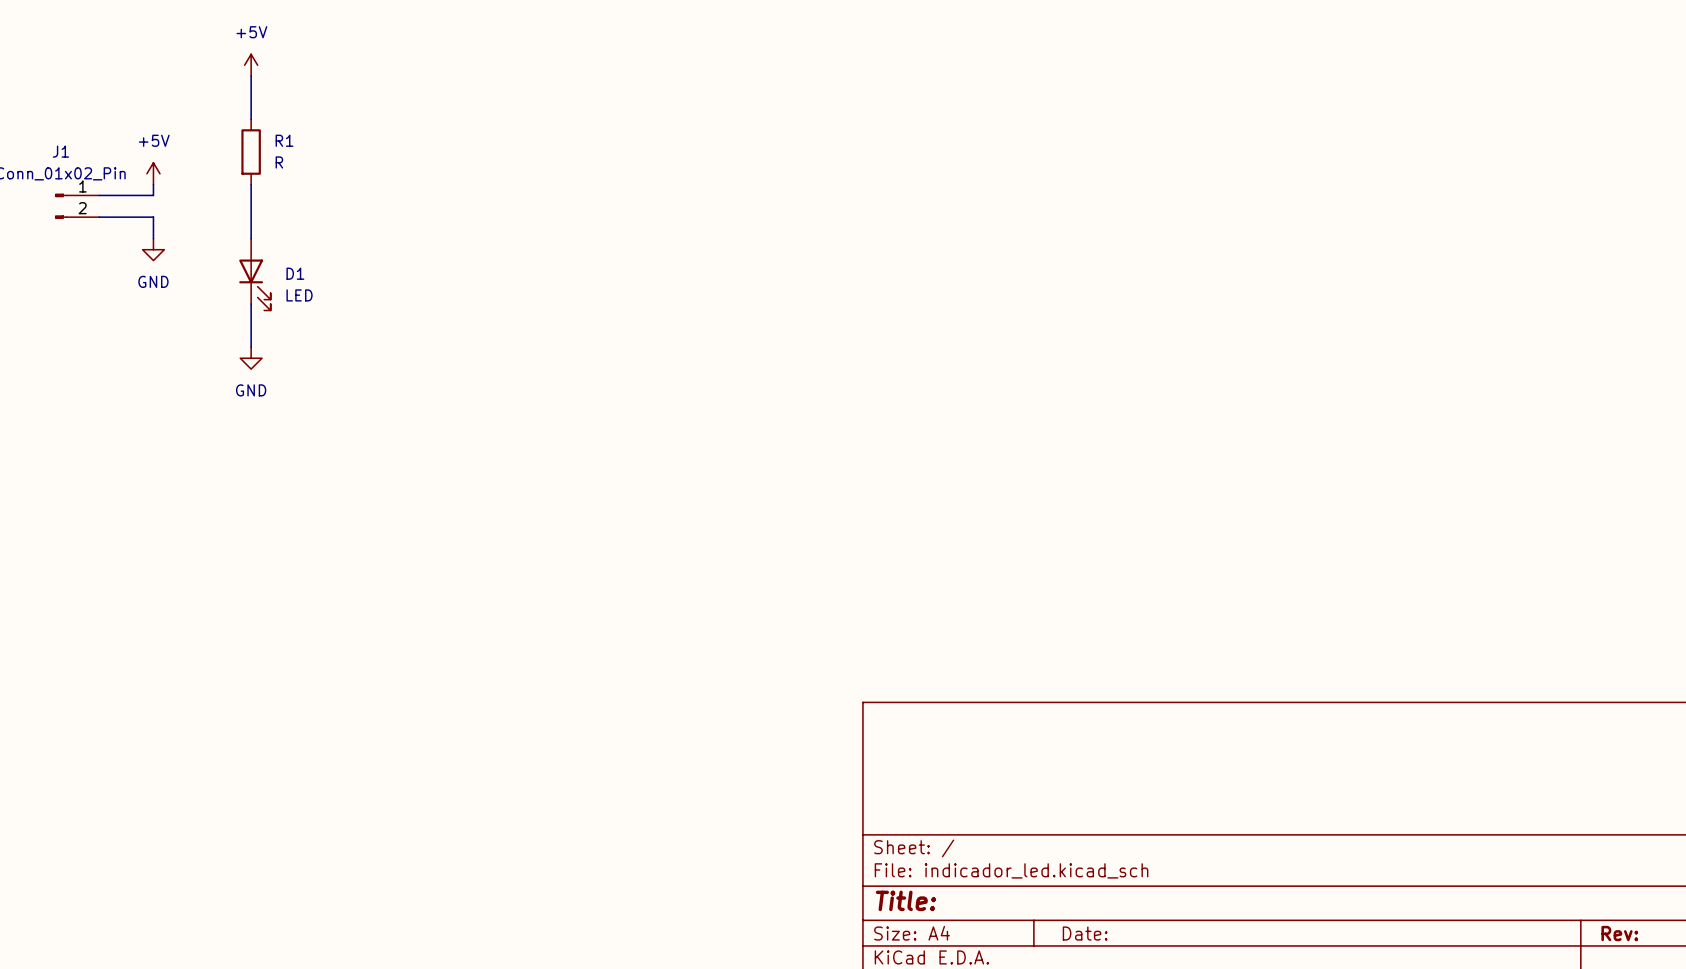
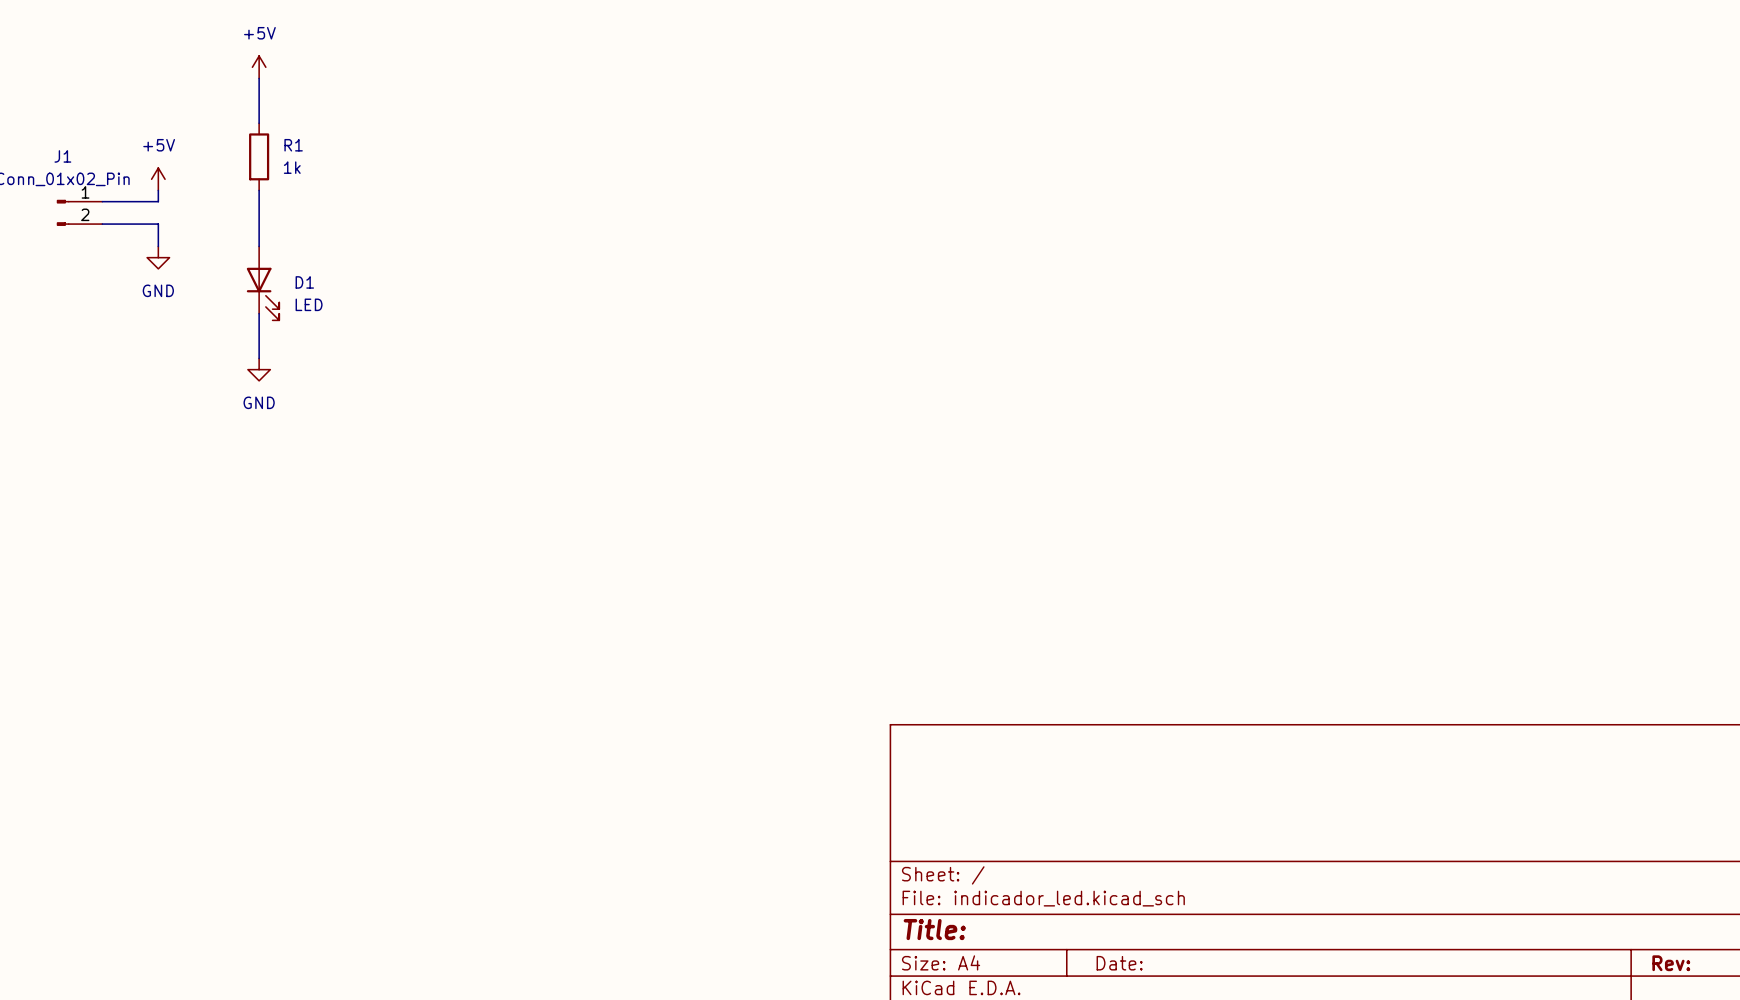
R1 value: R (279, 162) -> 1k (292, 167)

